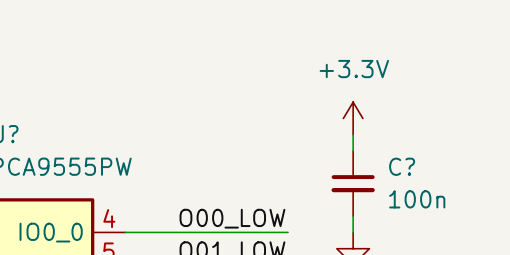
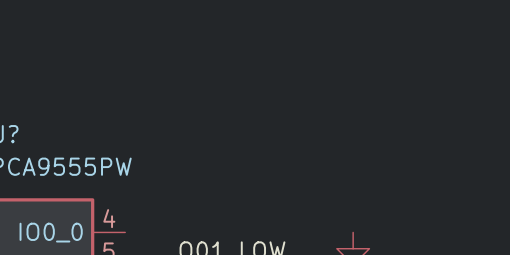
power symbol: +3.3V (353, 118) -> none
wire: (353, 134) (353, 151) -> none
C?: 100n (353, 183) -> none
wire: (353, 216) (353, 232) -> none
label: O00_LOW (232, 218) -> none
wire: (125, 232) (288, 232) -> none

